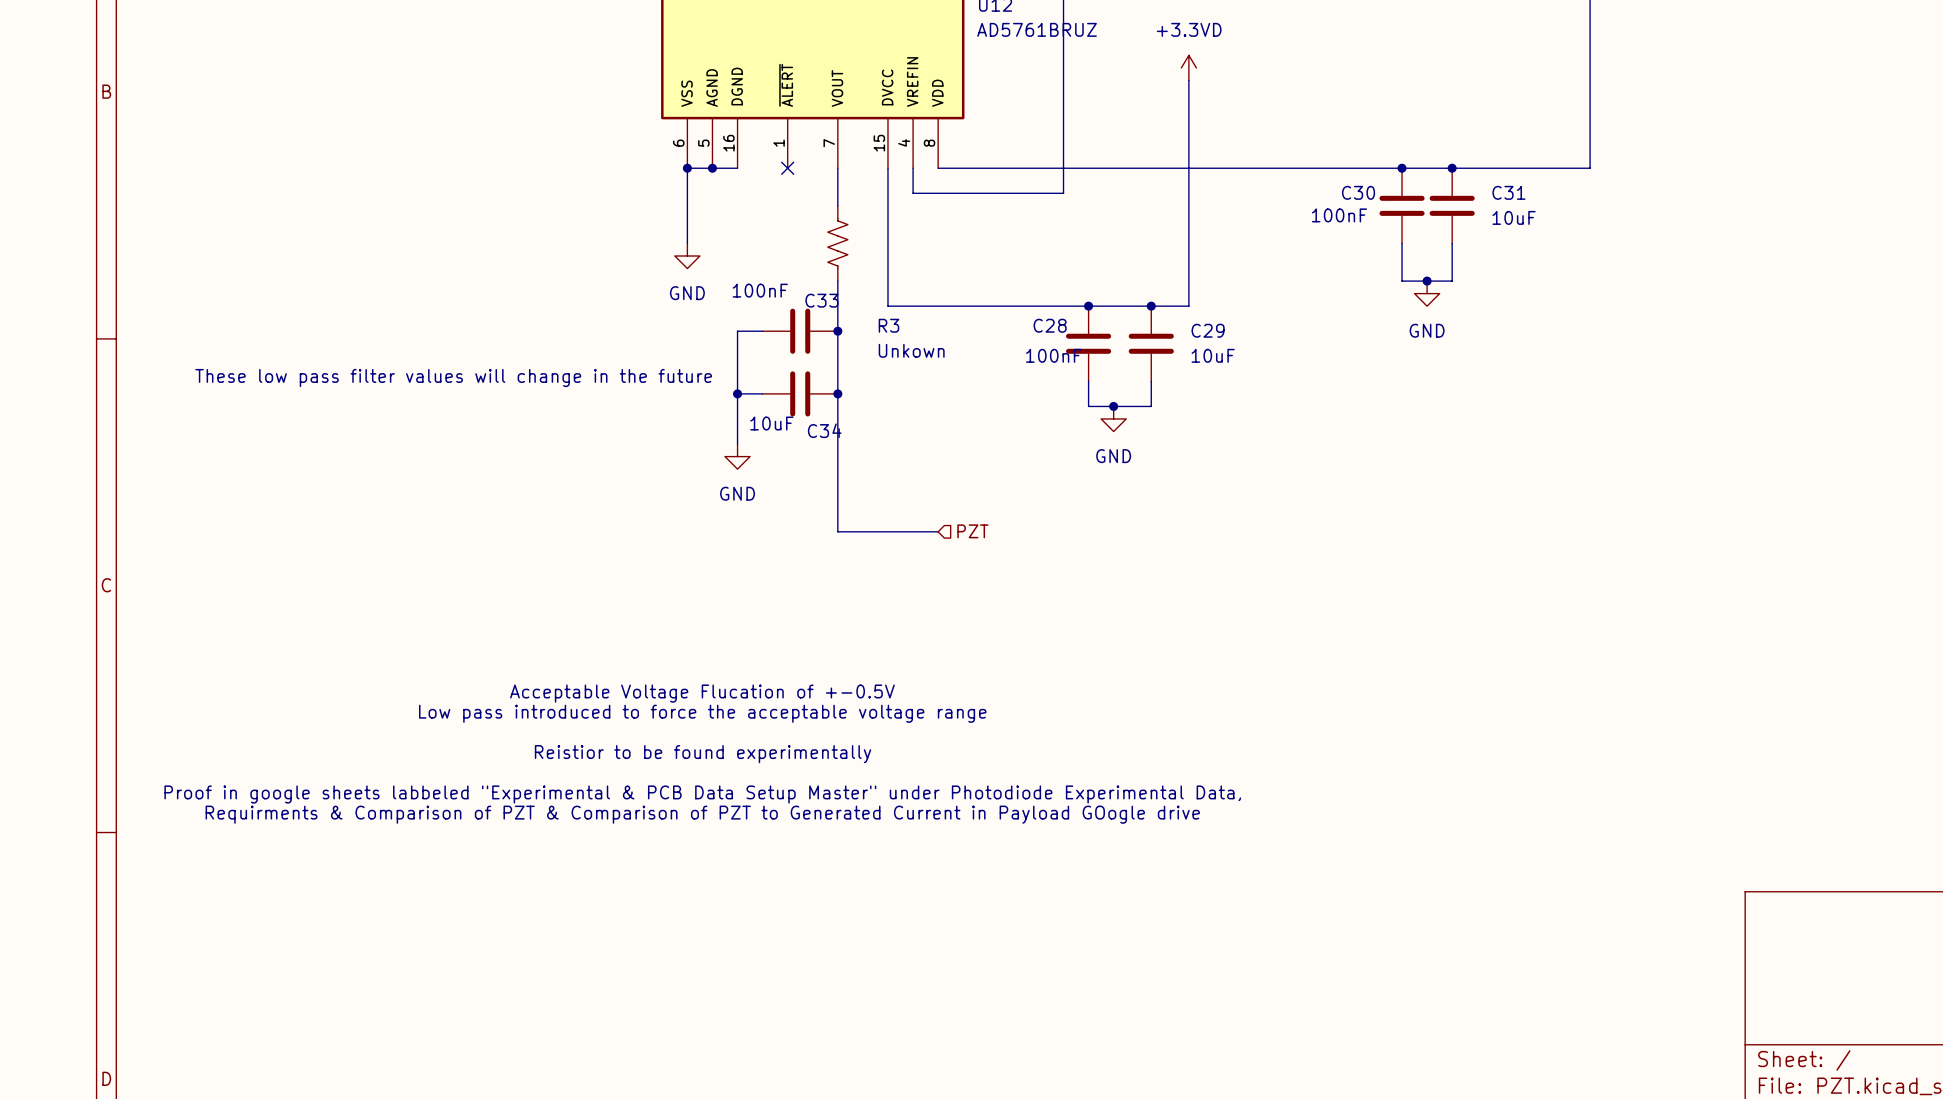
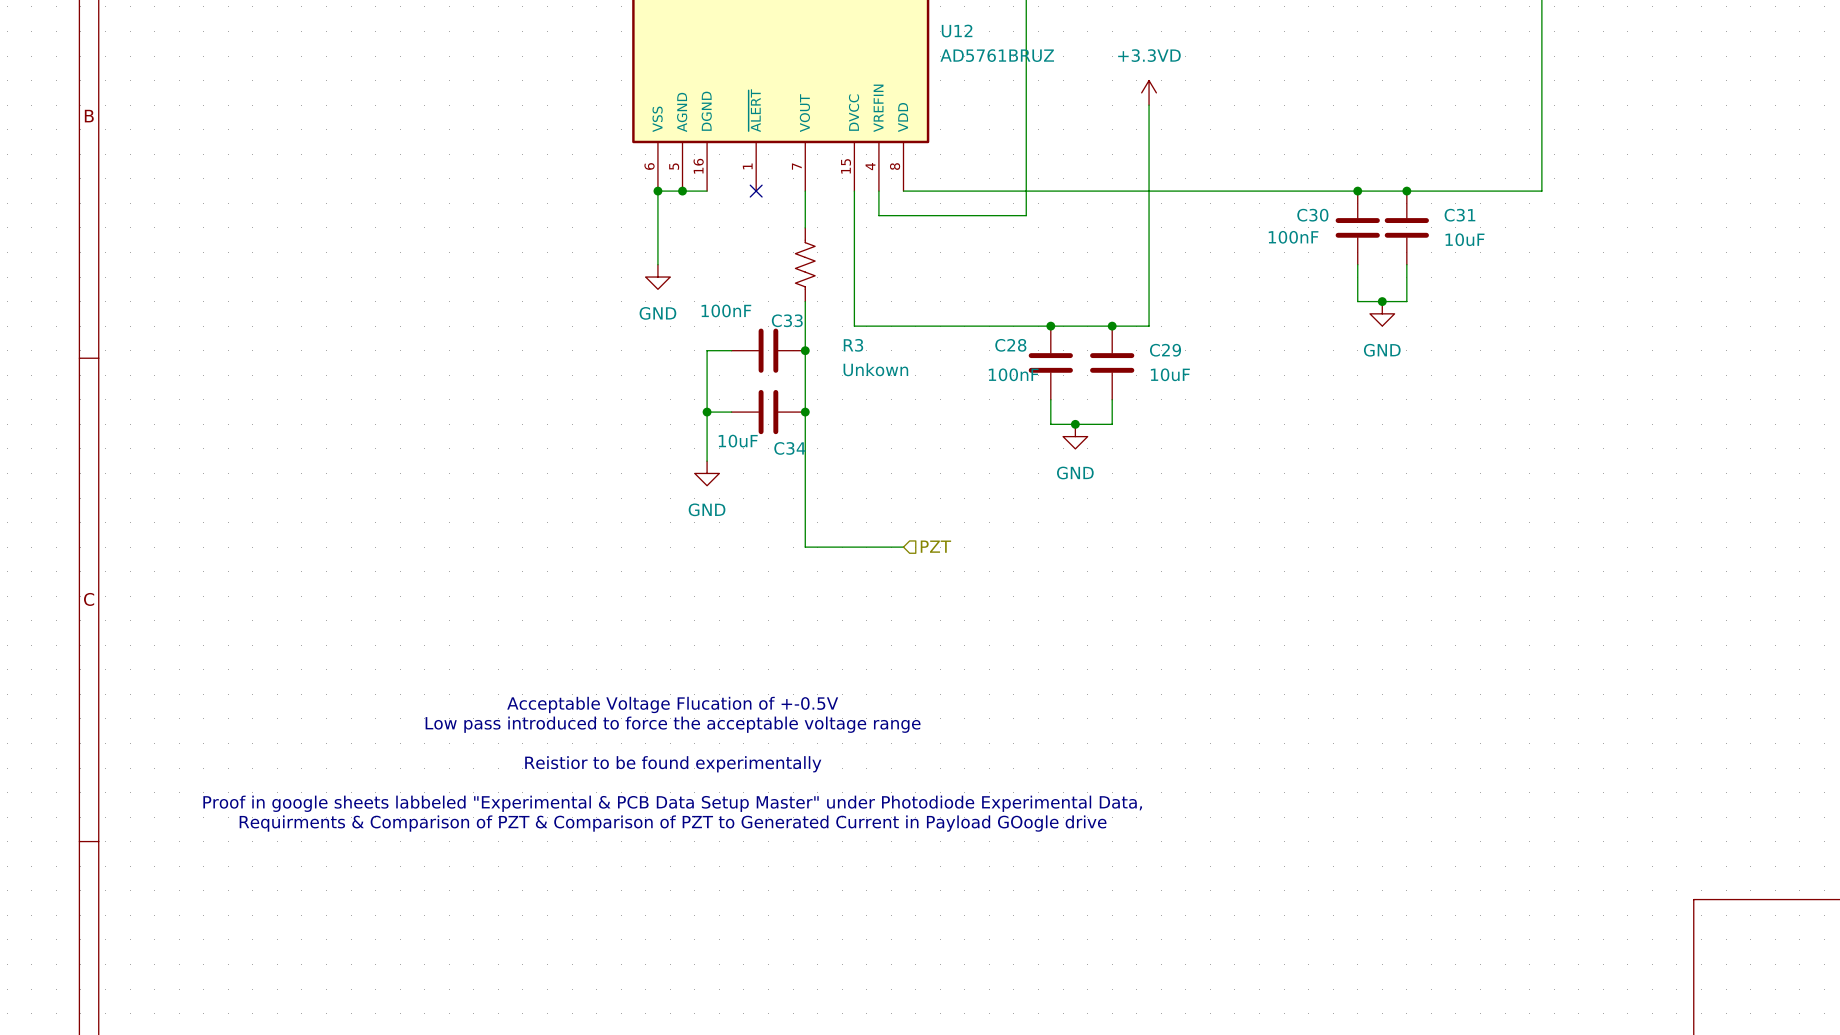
text: These low pass filter values will change in the future (453, 378) -> none

